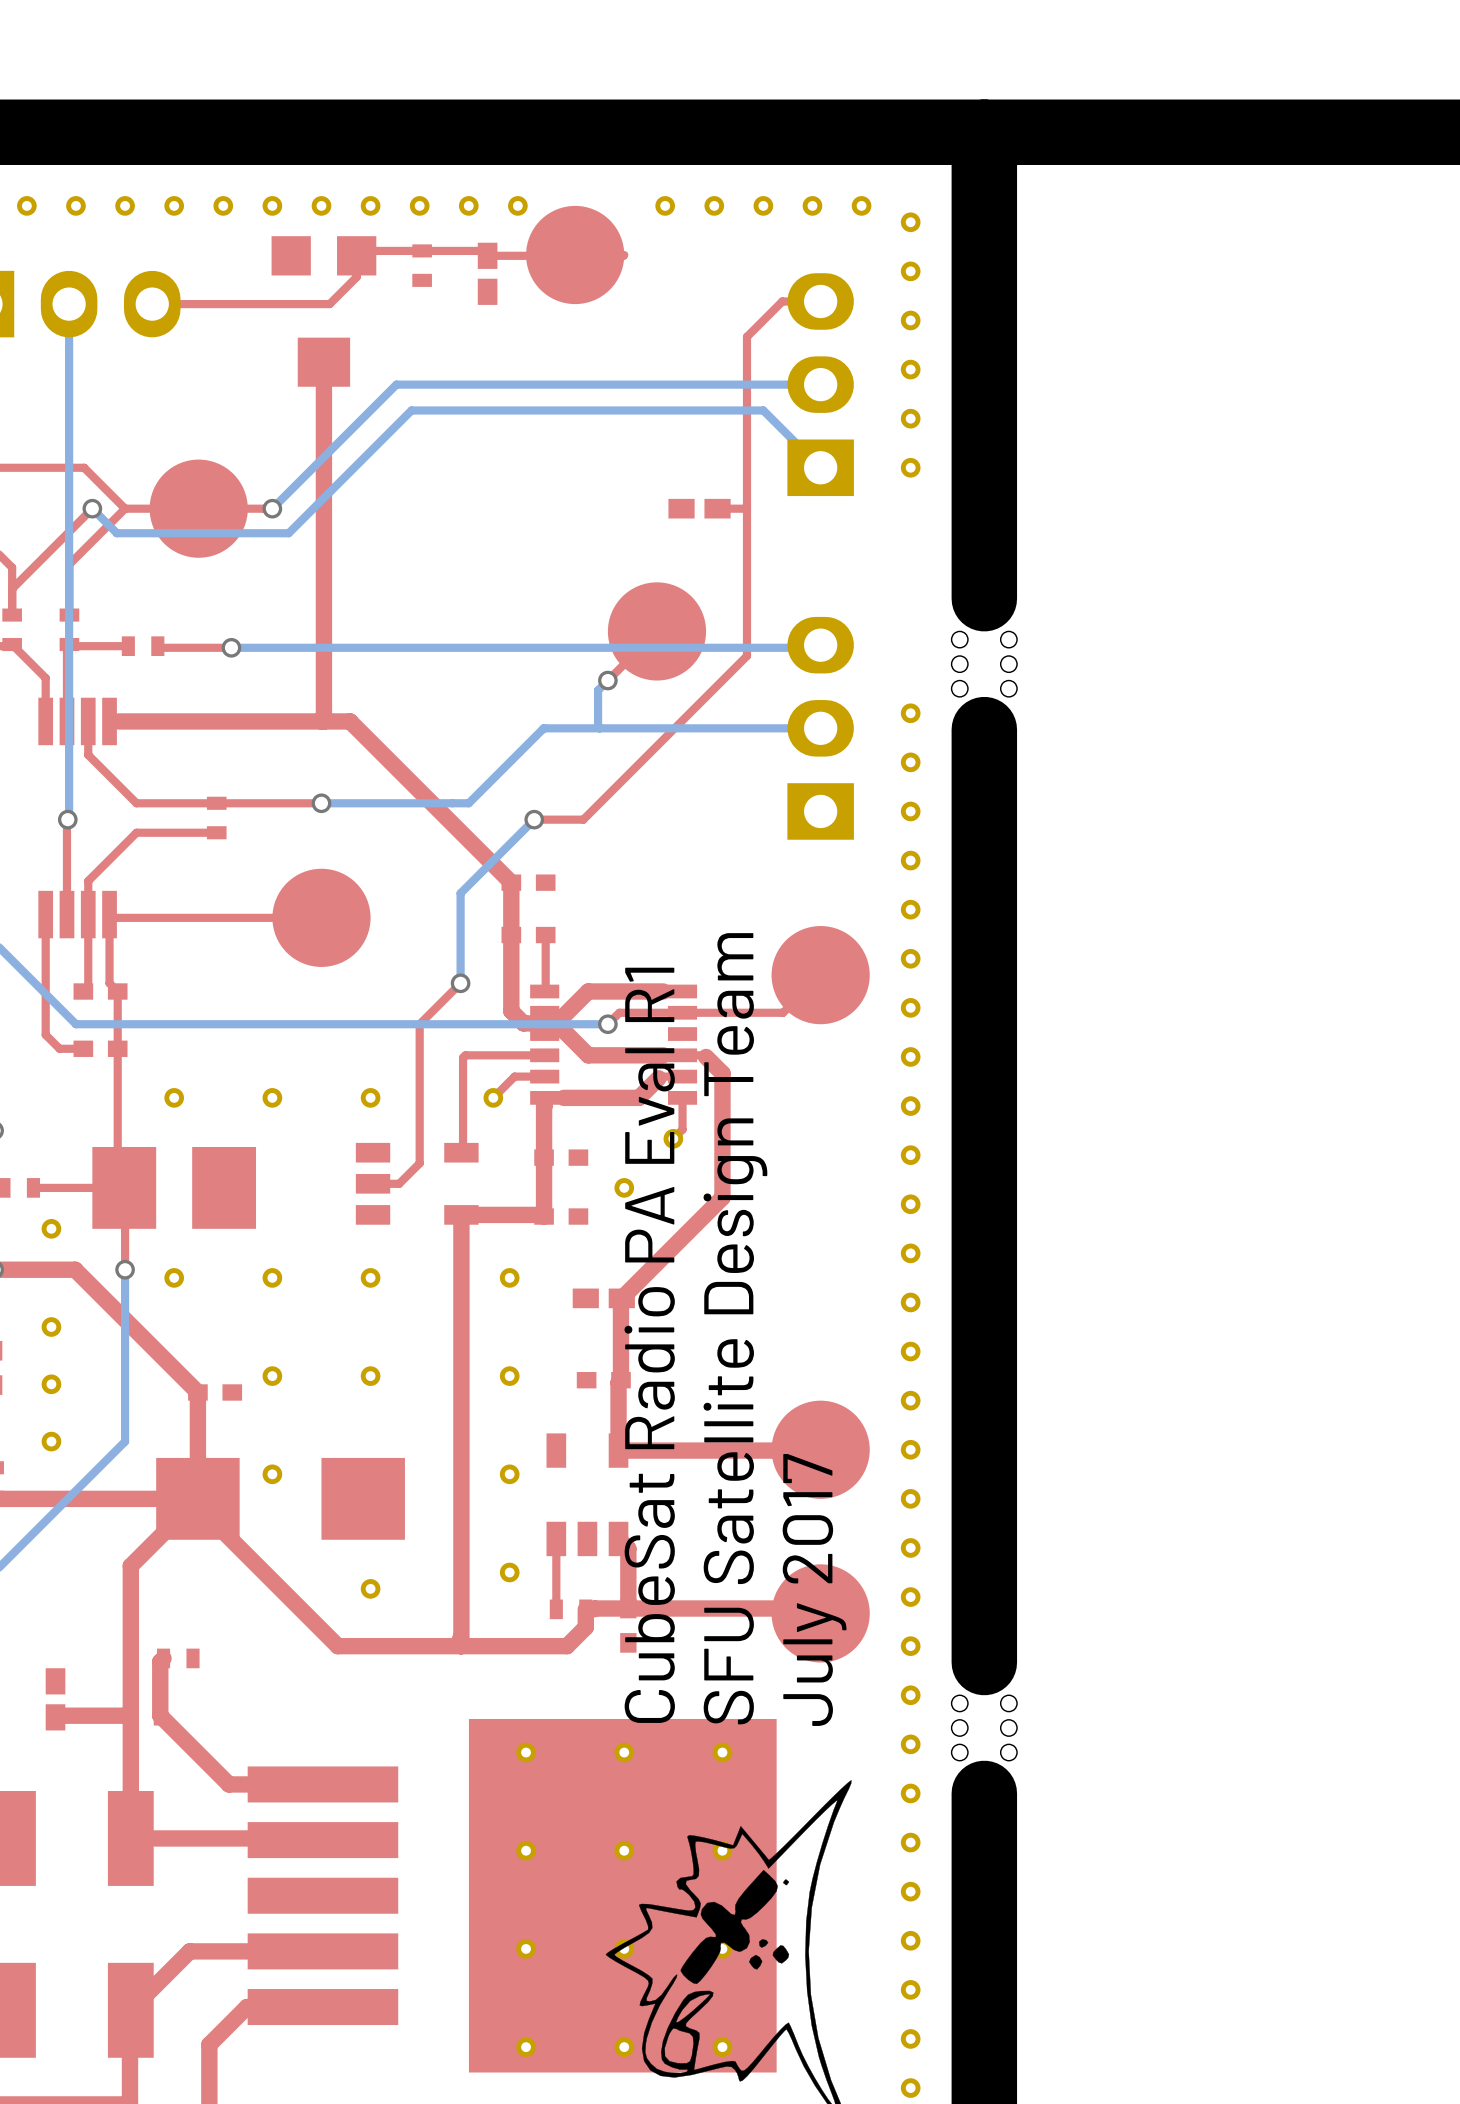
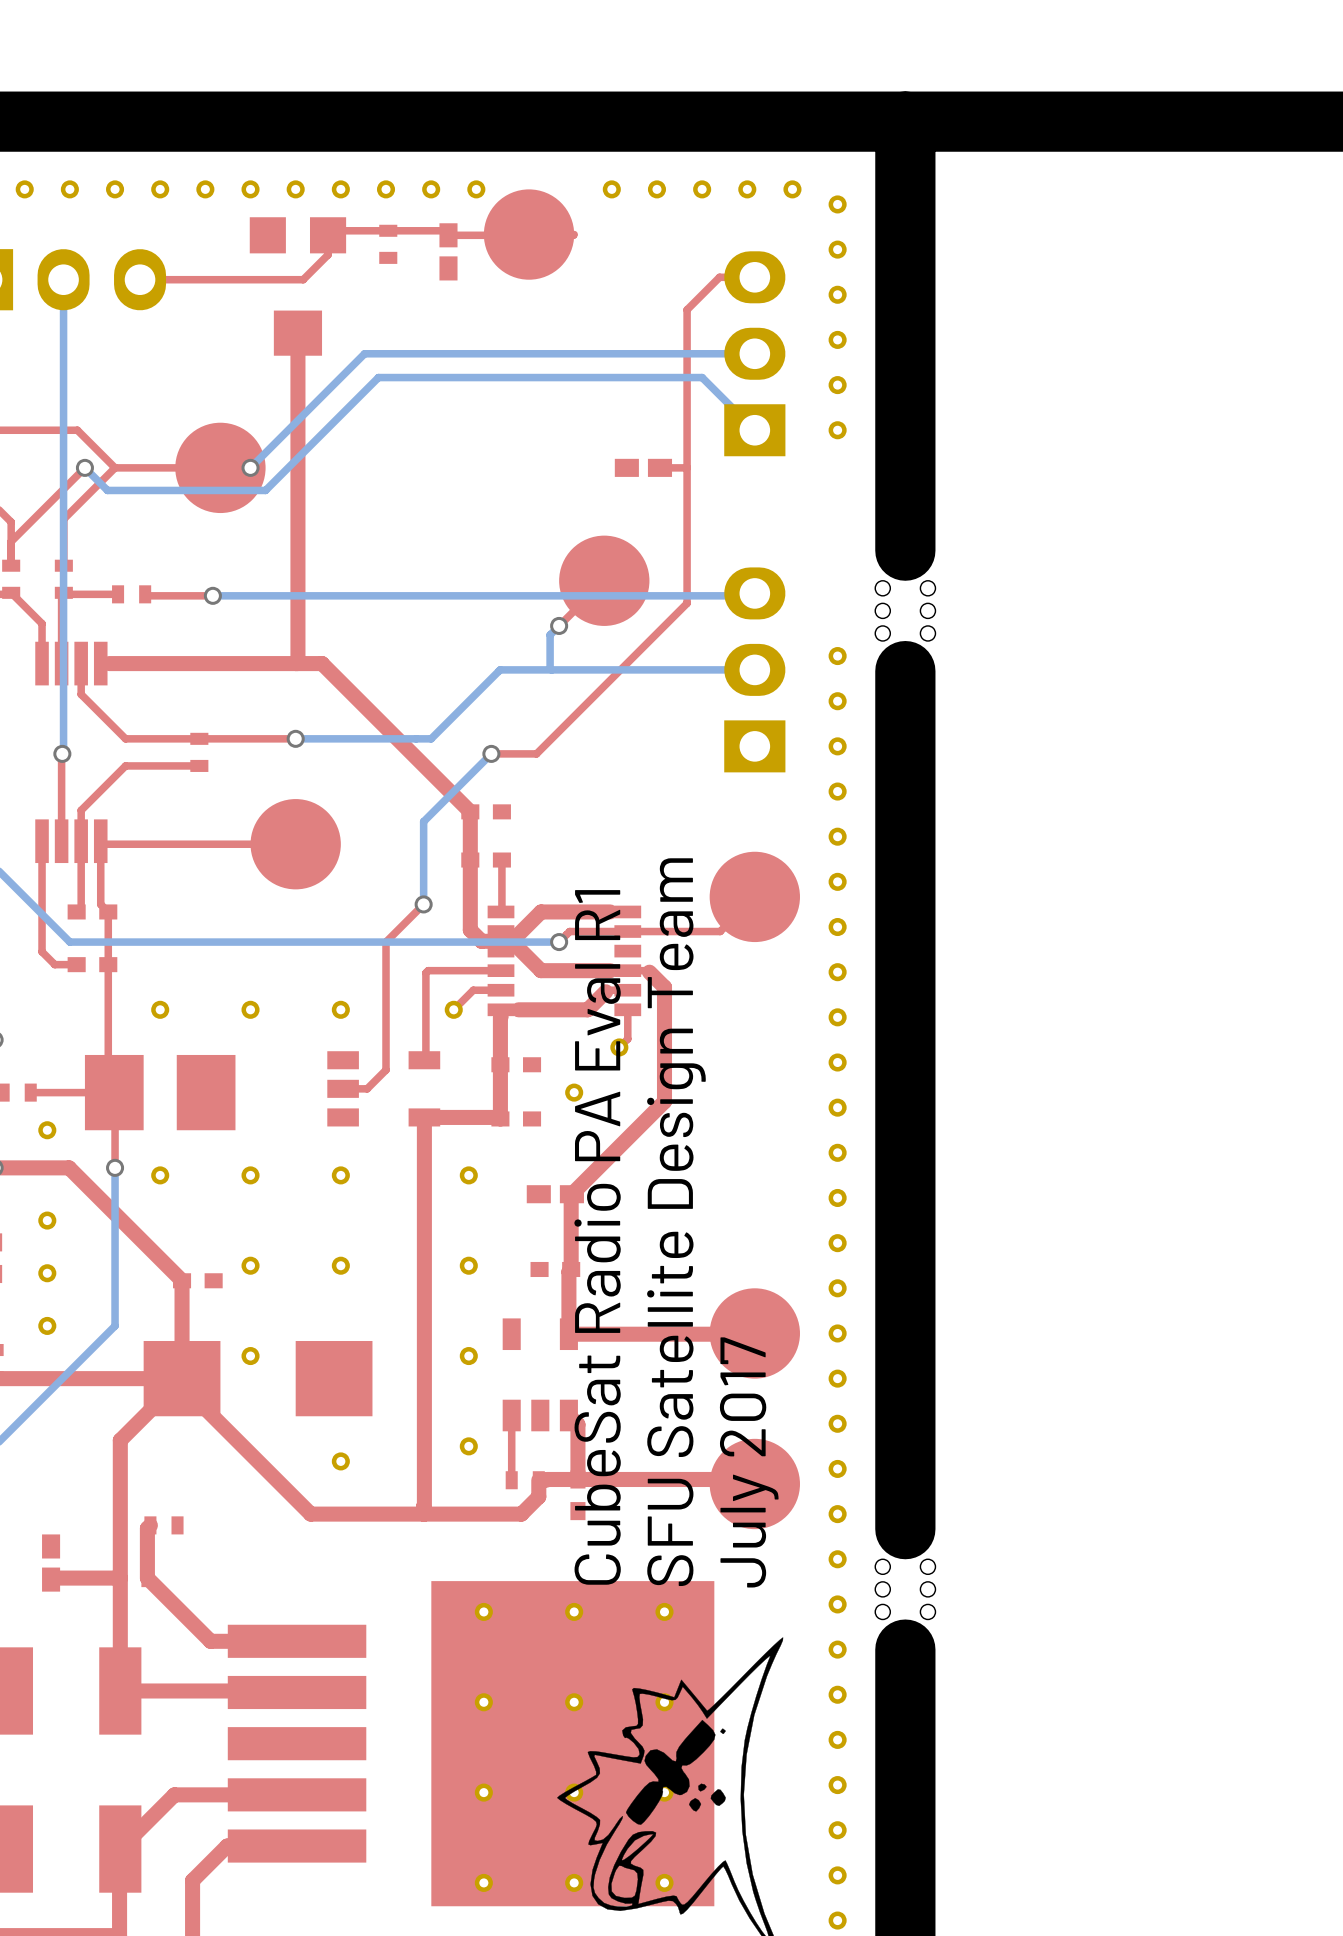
part position: (198, 508) -> (220, 467)

